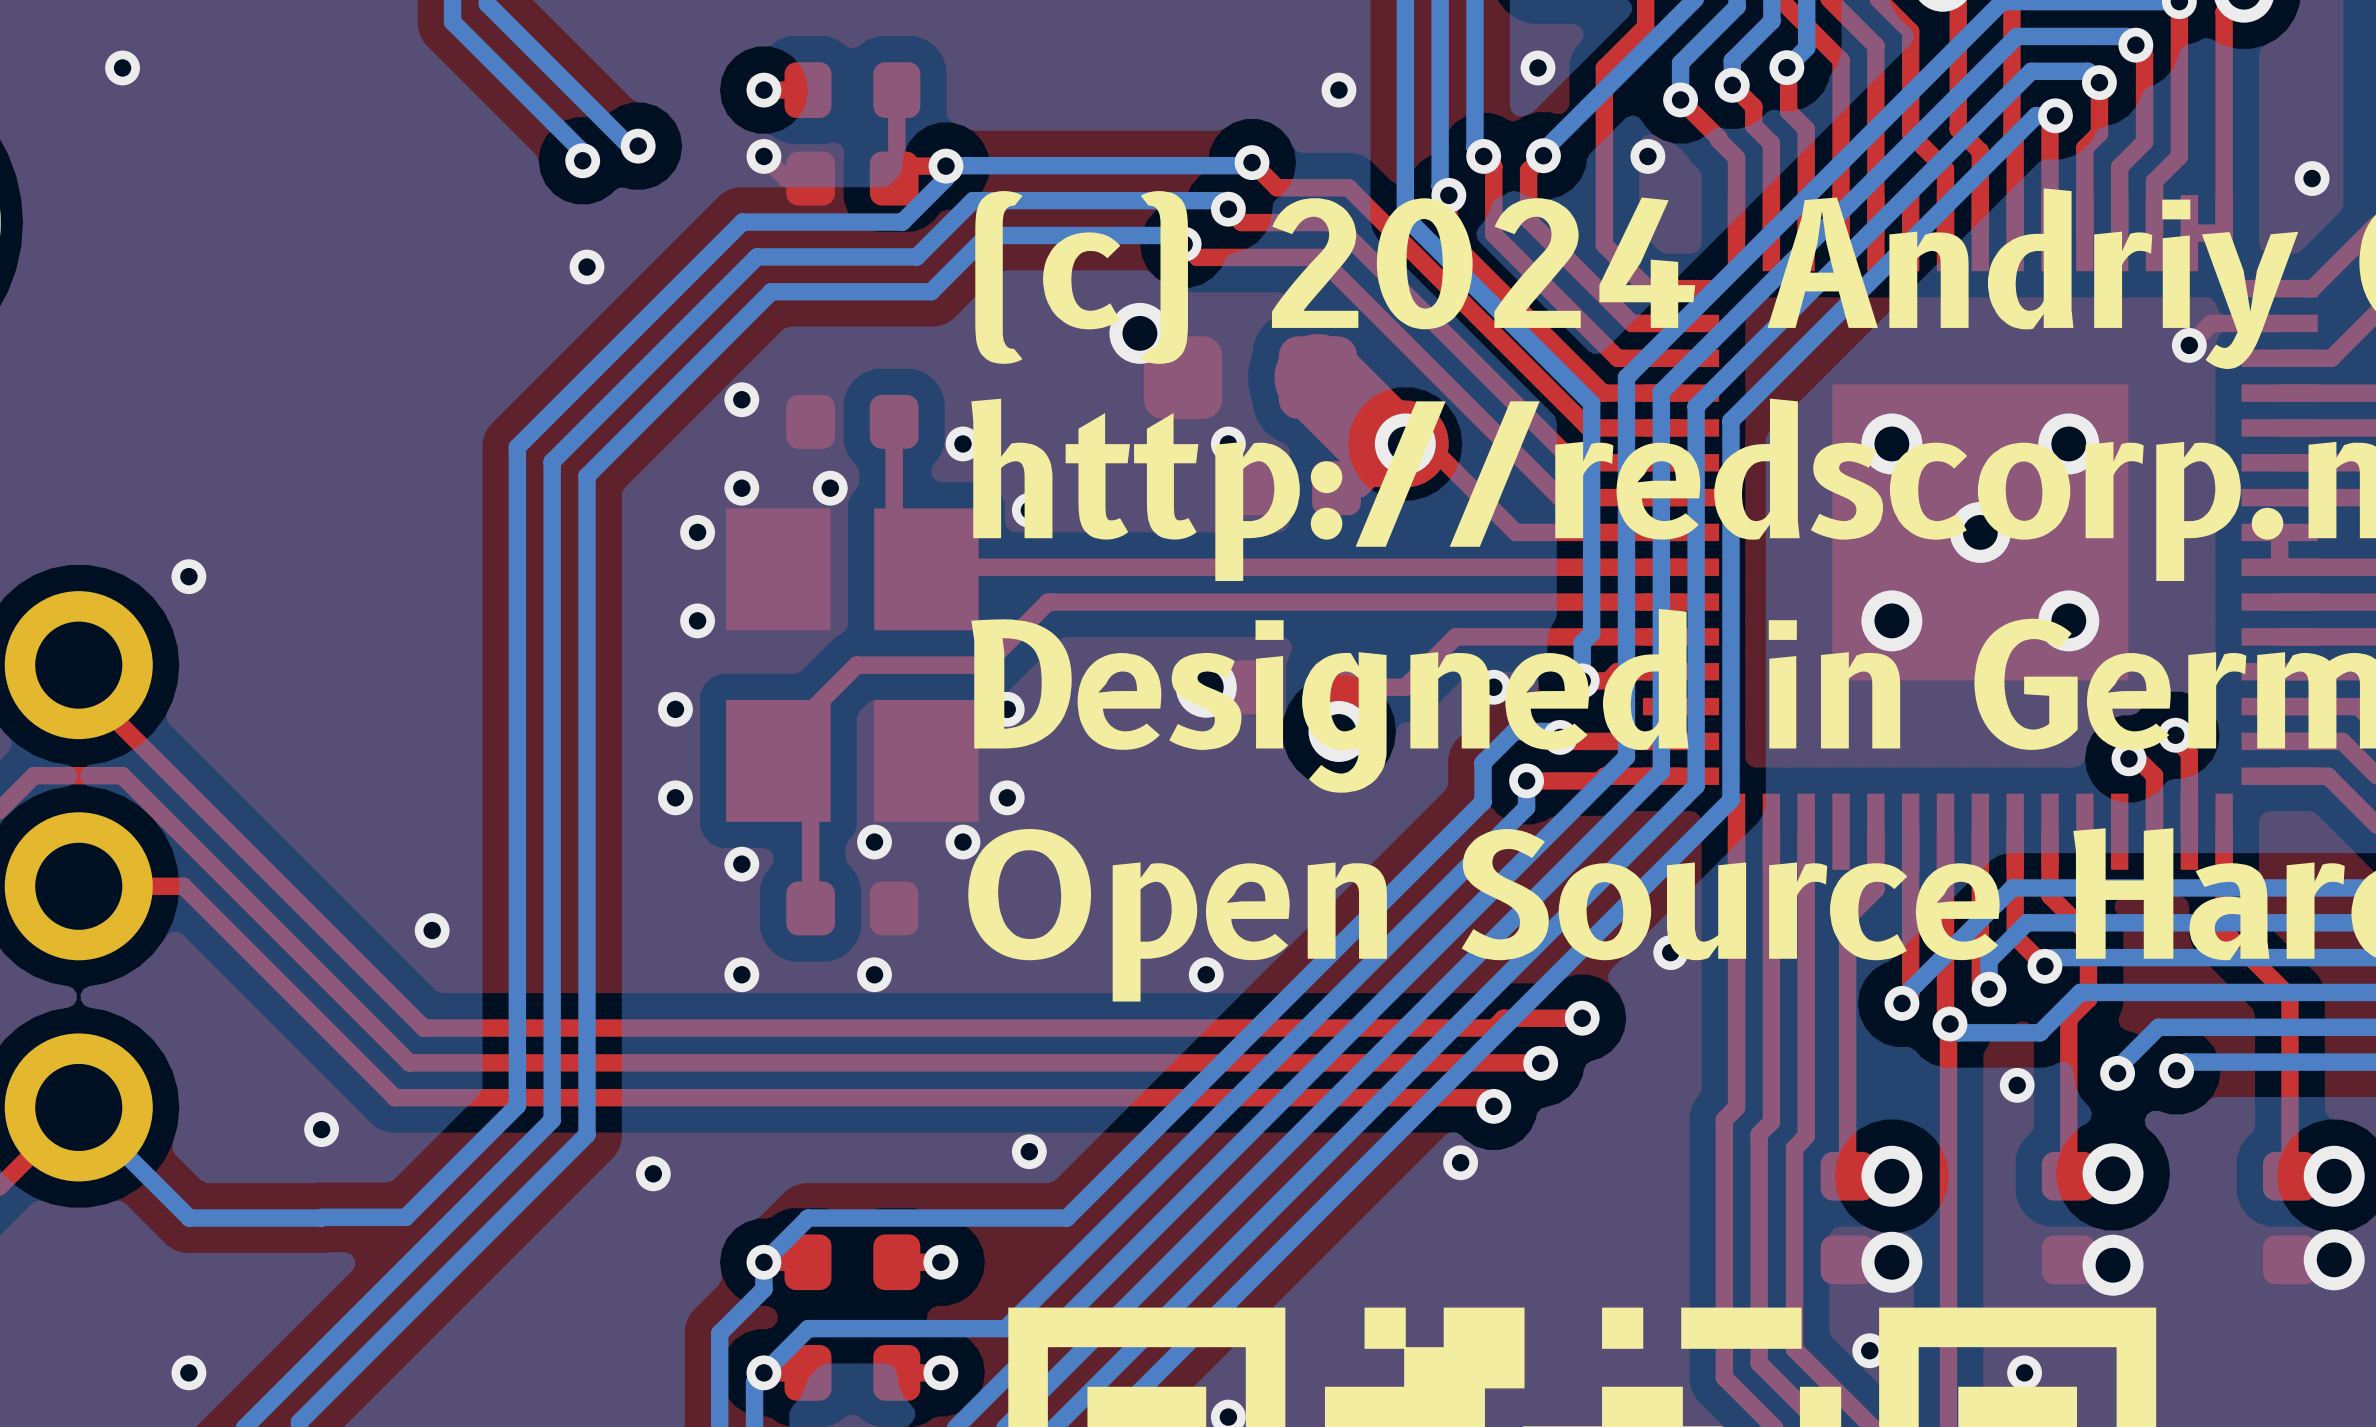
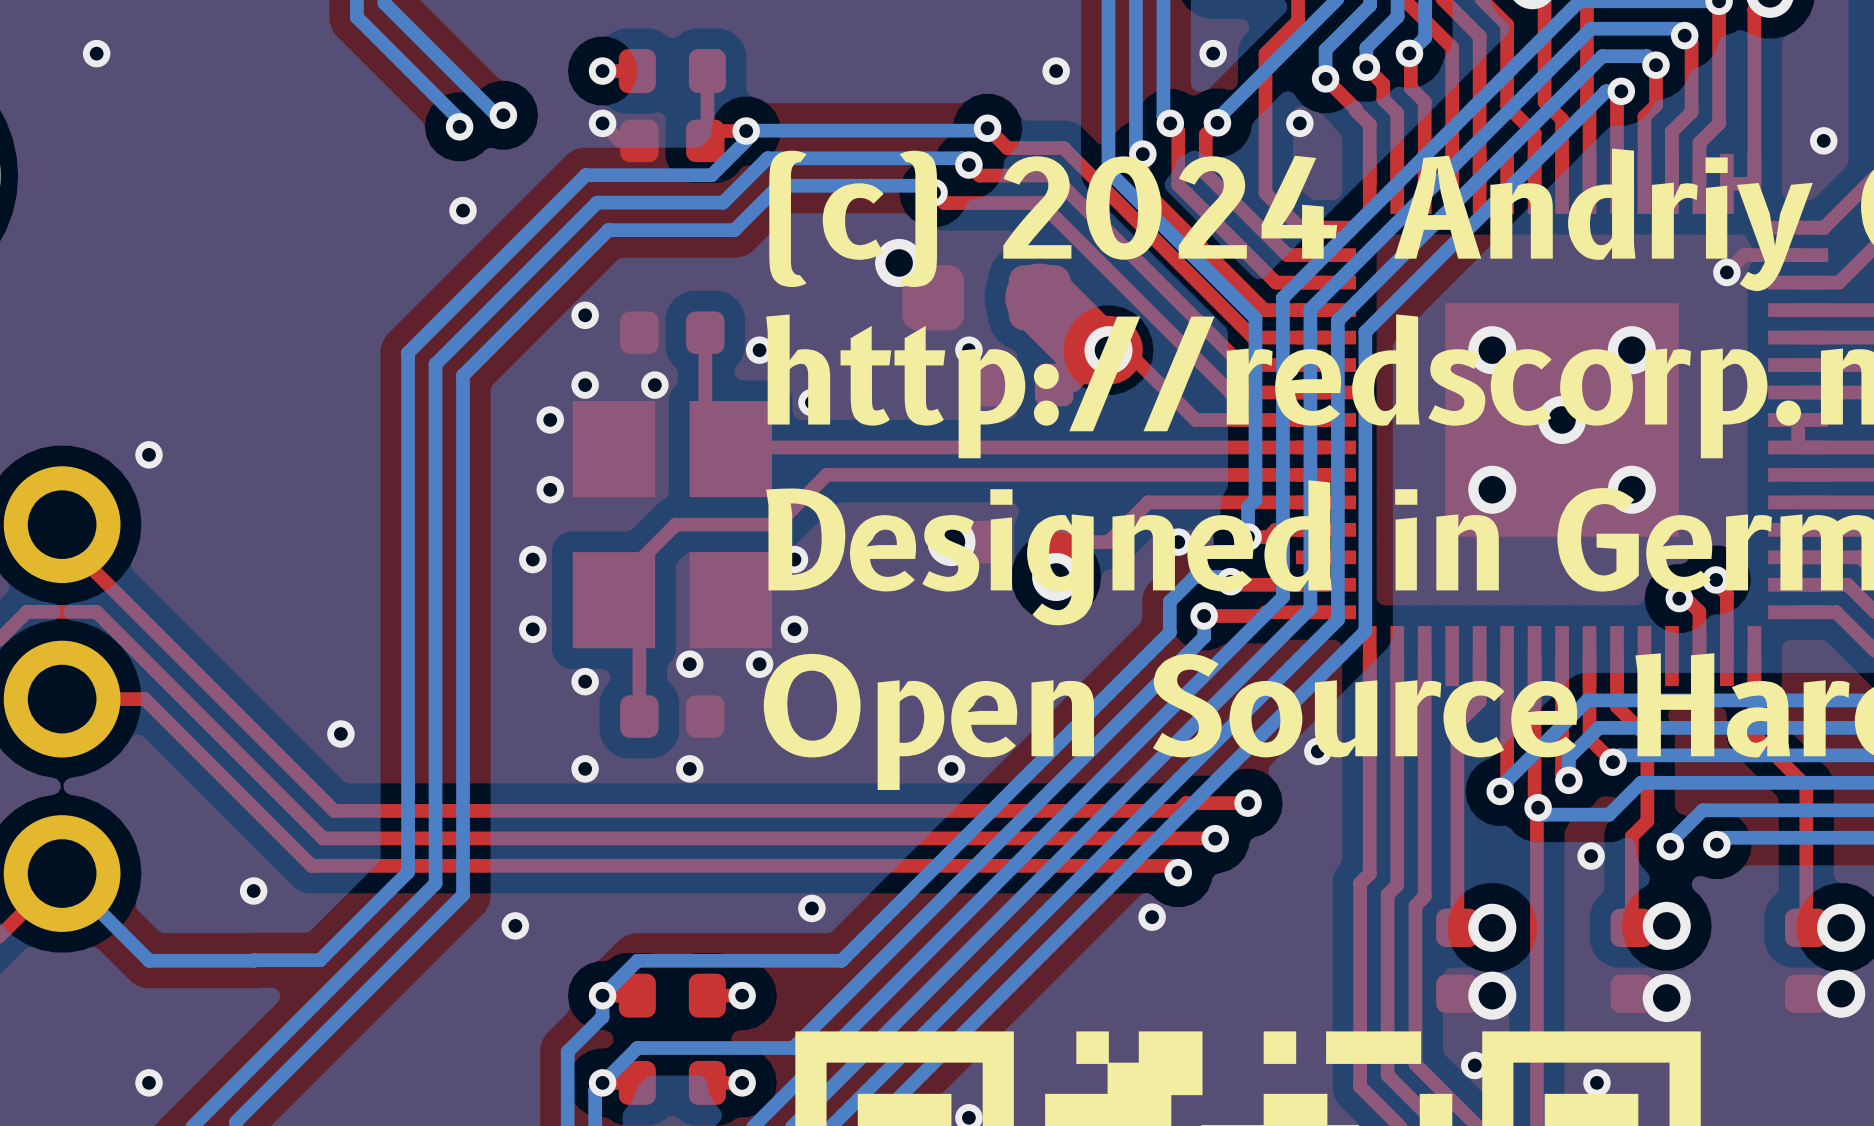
top track: (2088, 999) (2068, 1018) (2068, 1060) -> (1647, 788) (1647, 821) (1631, 836)

